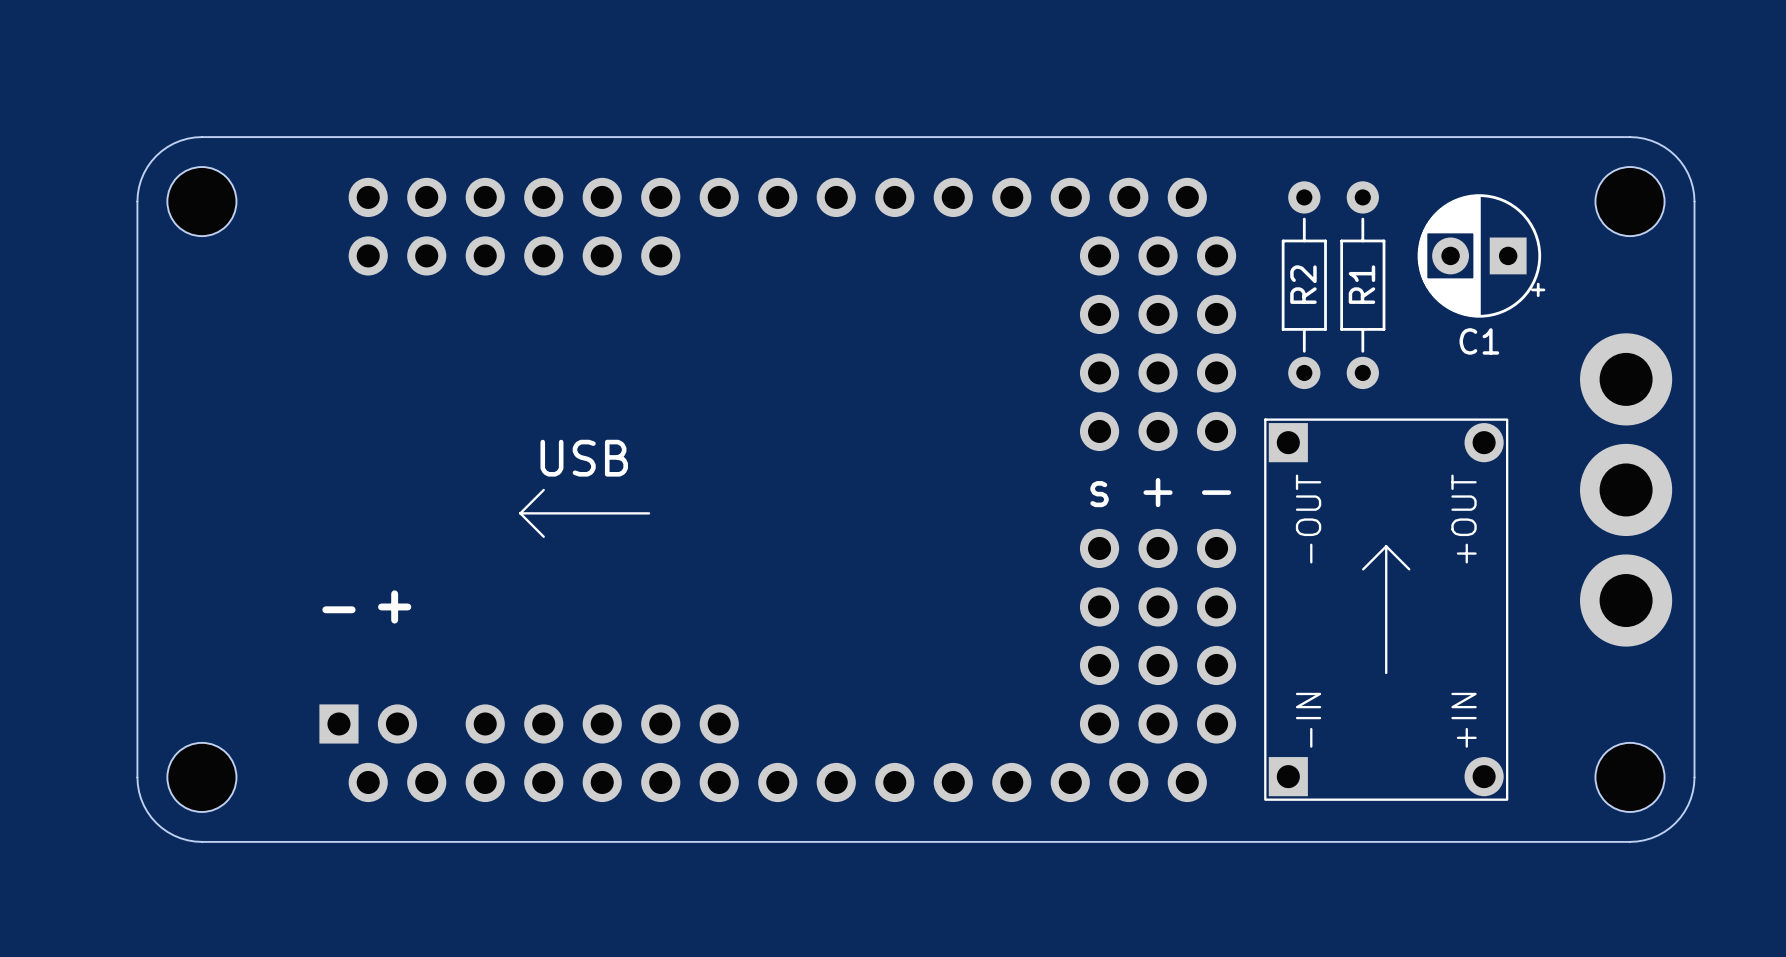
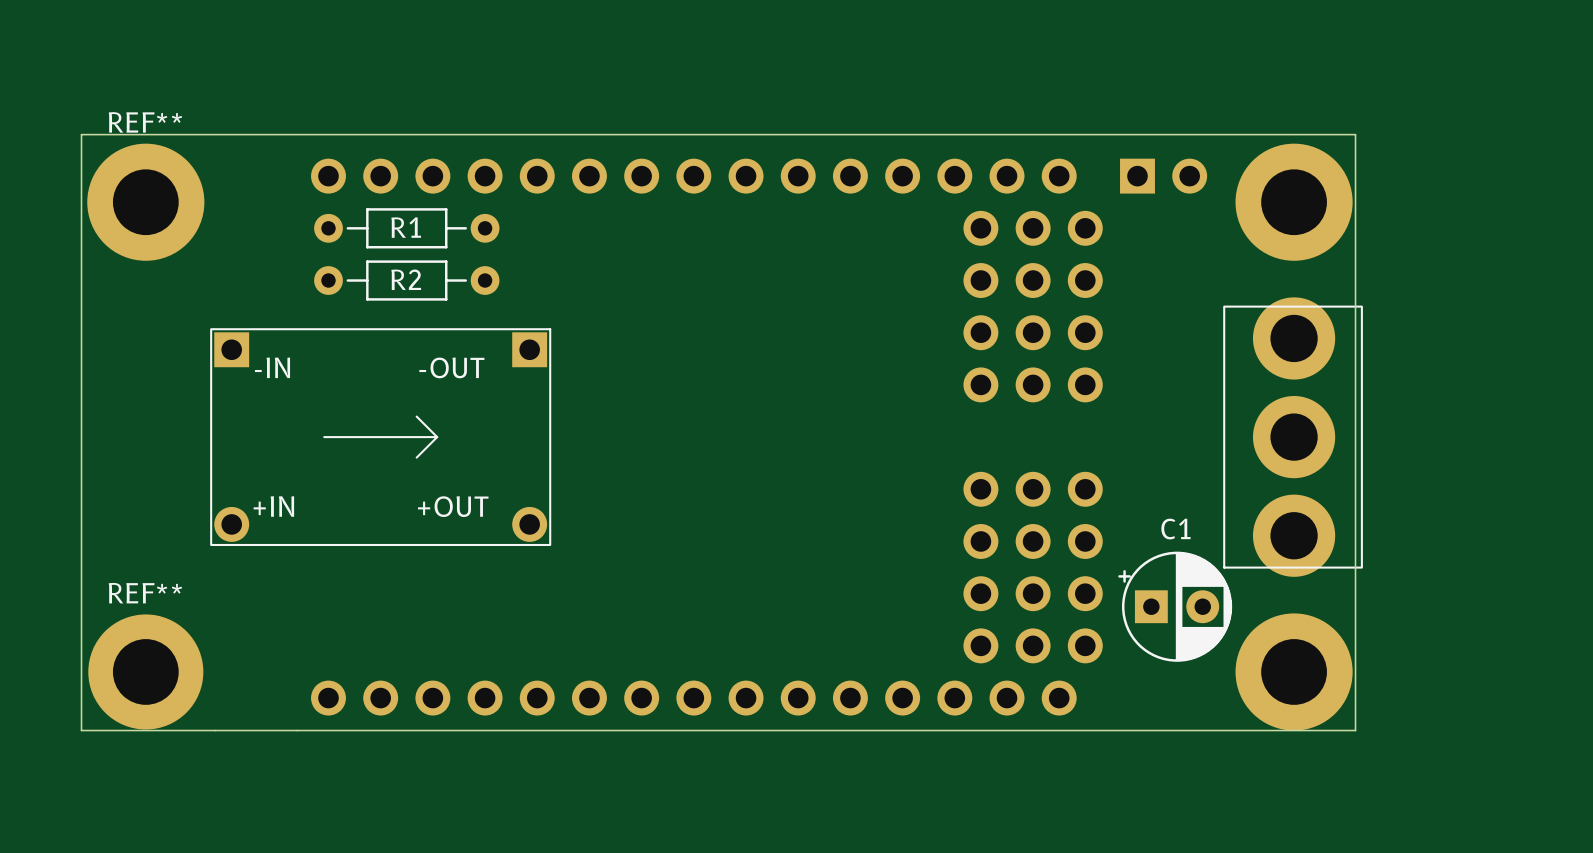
board edge: (201, 137) (1630, 137) (1644, 138) (1657, 143) (1675, 155) (1684, 167) (1690, 180) (1694, 201) (1694, 777) (1692, 791) (1688, 805) (1680, 817) (1664, 832) (1651, 838) (1630, 841) (201, 841) (187, 840) (173, 835) (156, 823) (147, 811) (141, 798) (137, 784) (137, 201) (141, 180) (147, 167) (156, 155) (167, 146) (180, 140) (201, 137) -> (81, 134) (81, 730) (1355, 730) (1355, 134) (81, 134)
part: none -> (1163, 176)
part: (201, 201) -> none
part: (1630, 201) -> none
REF**: none -> (145, 202)
part: none -> (1294, 202)
part: (514, 255) -> none
C1 rotation: 0° (1481, 255) -> 180° (1175, 606)
C1 position: (1481, 255) -> (1175, 606)
R2 rotation: 0° (1304, 285) -> 90° clockwise (406, 280)
R2 position: (1304, 285) -> (406, 280)
R1 rotation: 0° (1362, 285) -> 90° clockwise (406, 228)
R1 position: (1362, 285) -> (406, 228)
text: USB (584, 458) -> none
part: none -> (380, 437)
line: (543, 489) (520, 513) -> none
part: none -> (1293, 437)
part: (1626, 489) -> none
text: + (1158, 492) -> none
text: - (1216, 492) -> none
text: s (1099, 494) -> none
line: (520, 513) (543, 536) -> none
line: (520, 513) (649, 513) -> none
text: + (394, 606) -> none
text: - (338, 609) -> none
part: (1386, 609) -> none
part: (368, 723) -> none
part: (602, 723) -> none
REF**: none -> (145, 671)
part: none -> (1294, 671)
part: (201, 777) -> none
part: (1630, 777) -> none

